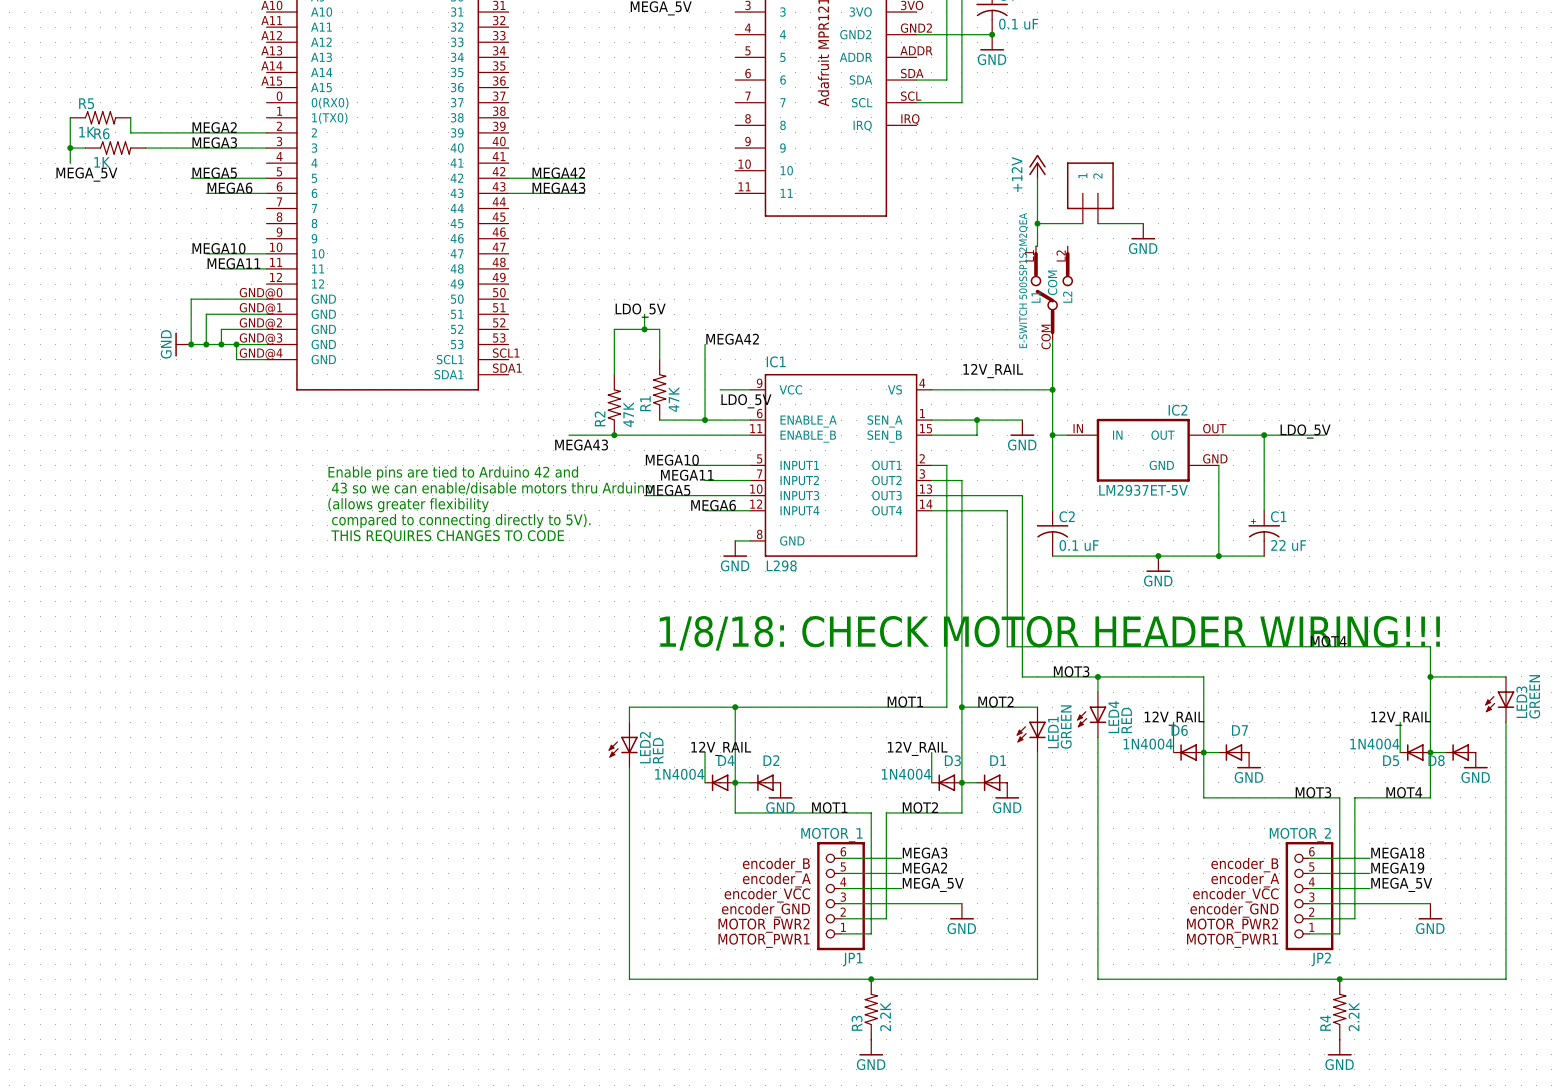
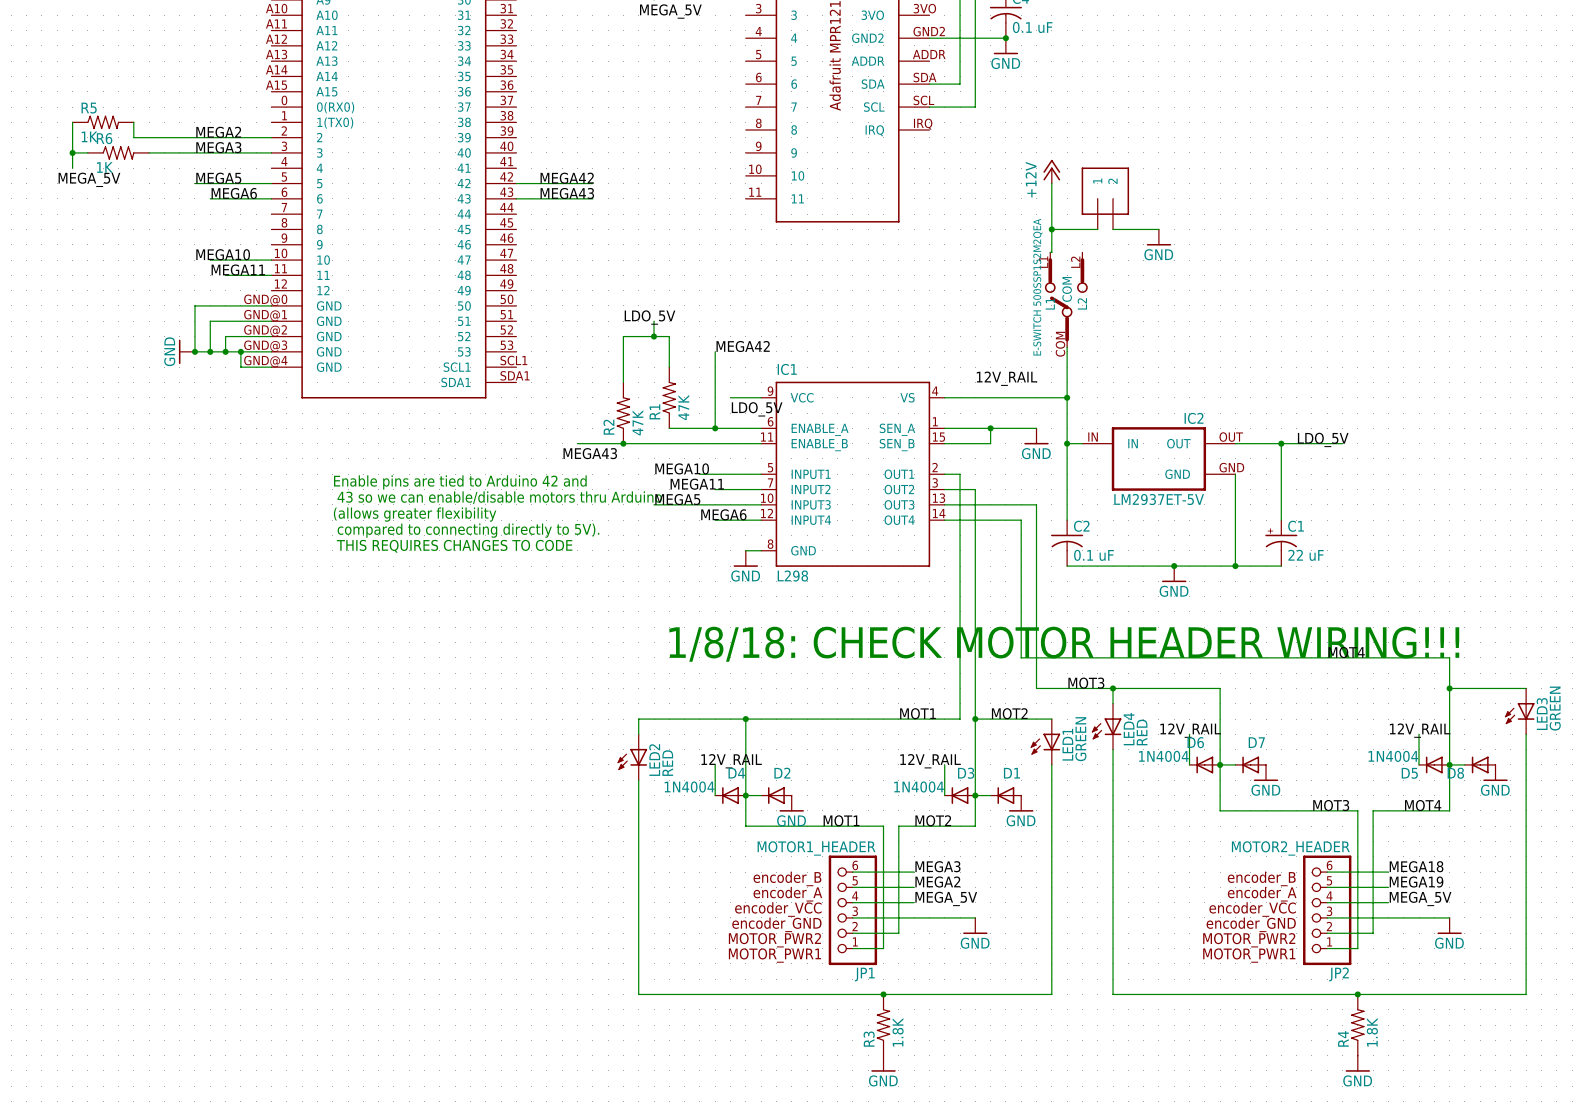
JP1 value: MOTOR_1 (831, 835) -> MOTOR1_HEADER (816, 848)
JP2 value: MOTOR_2 (1300, 835) -> MOTOR2_HEADER (1290, 848)
R3 value: 2.2K (885, 1016) -> 1.8K (898, 1032)
R4 value: 2.2K (1354, 1016) -> 1.8K (1372, 1032)

